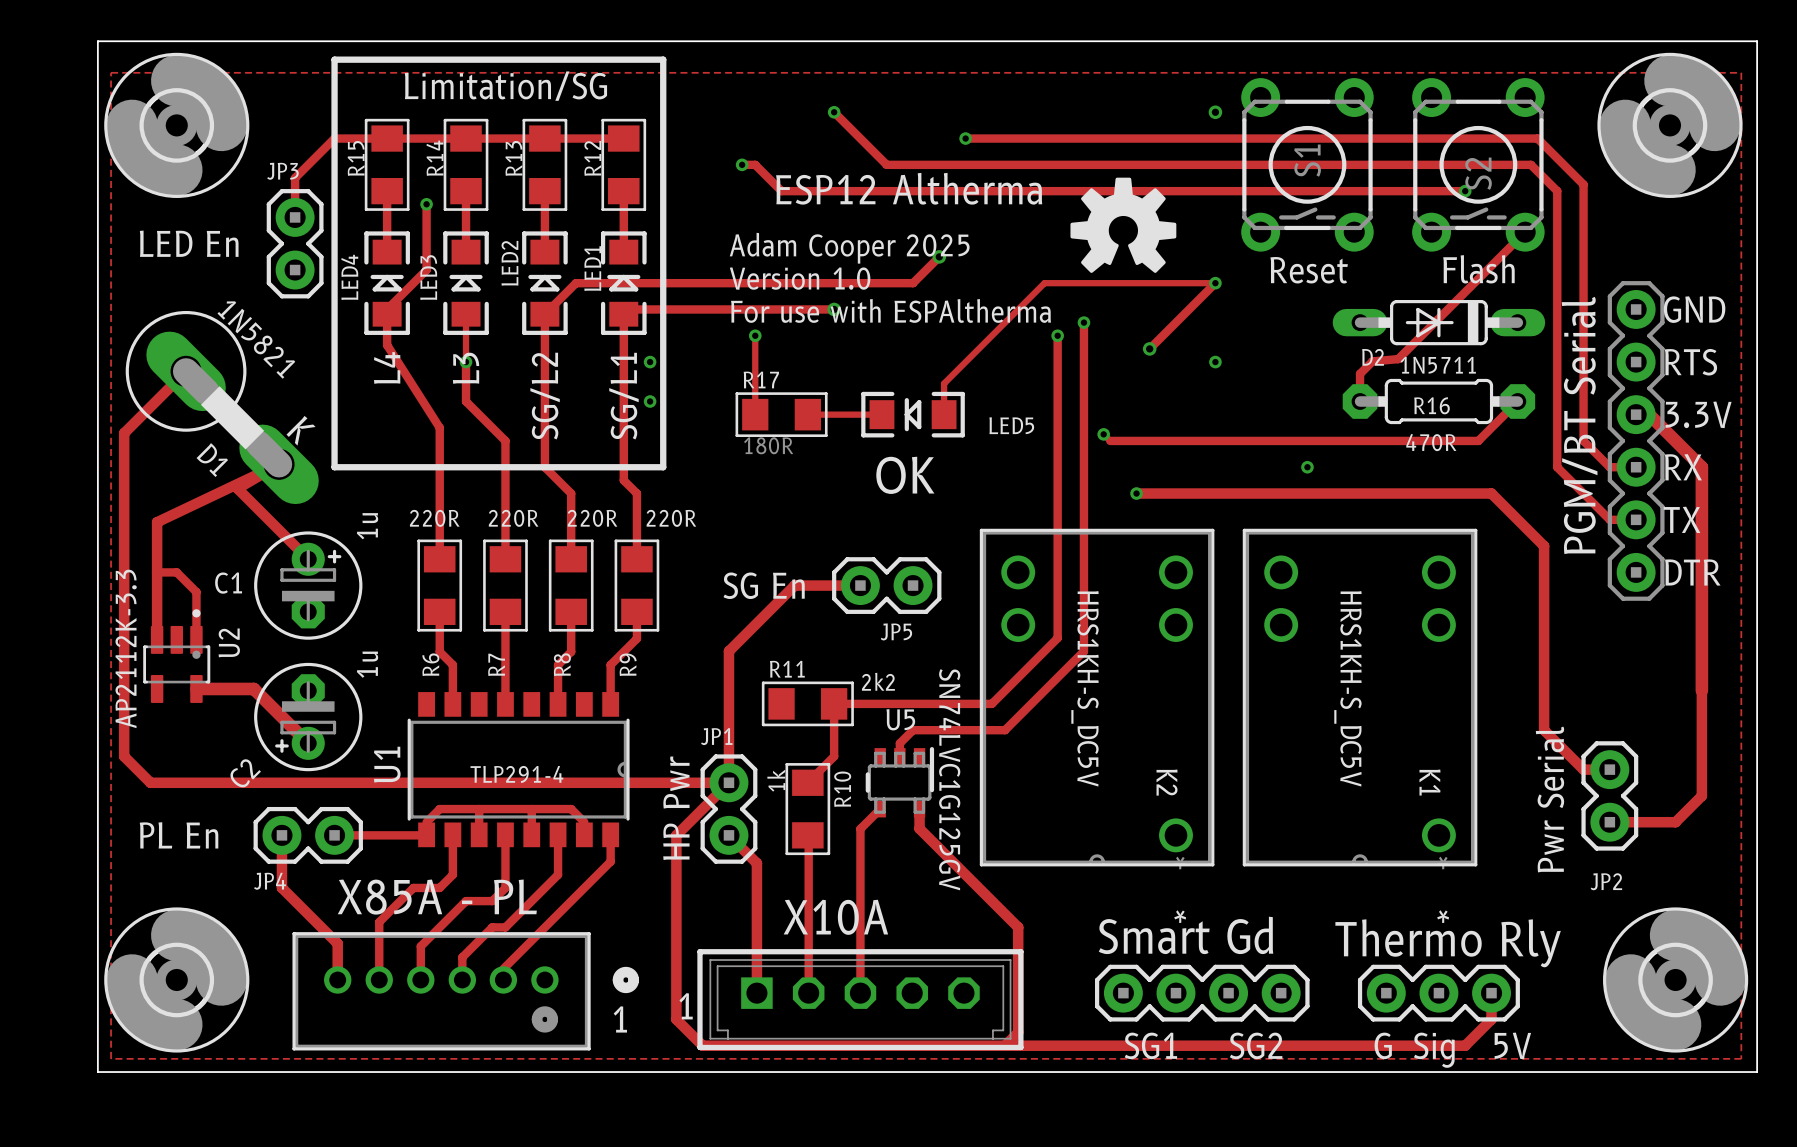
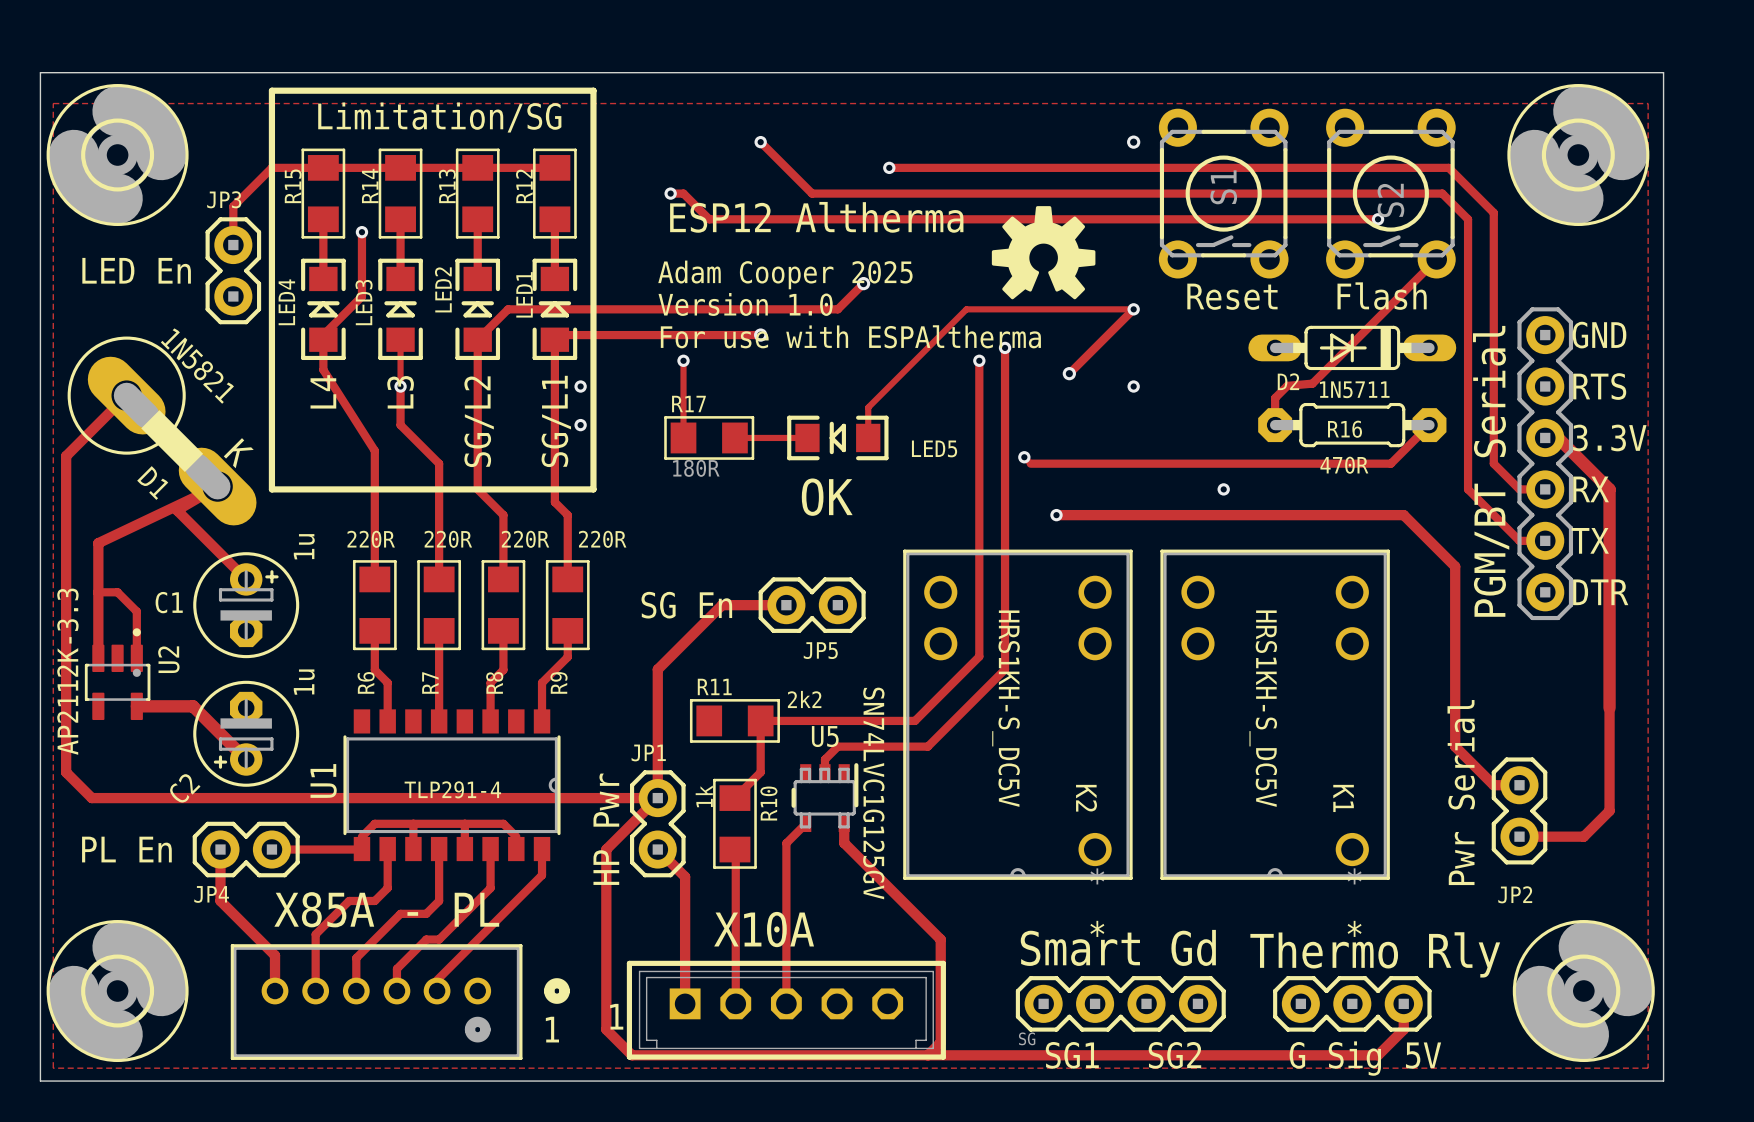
part value: none -> SG (1027, 1038)

